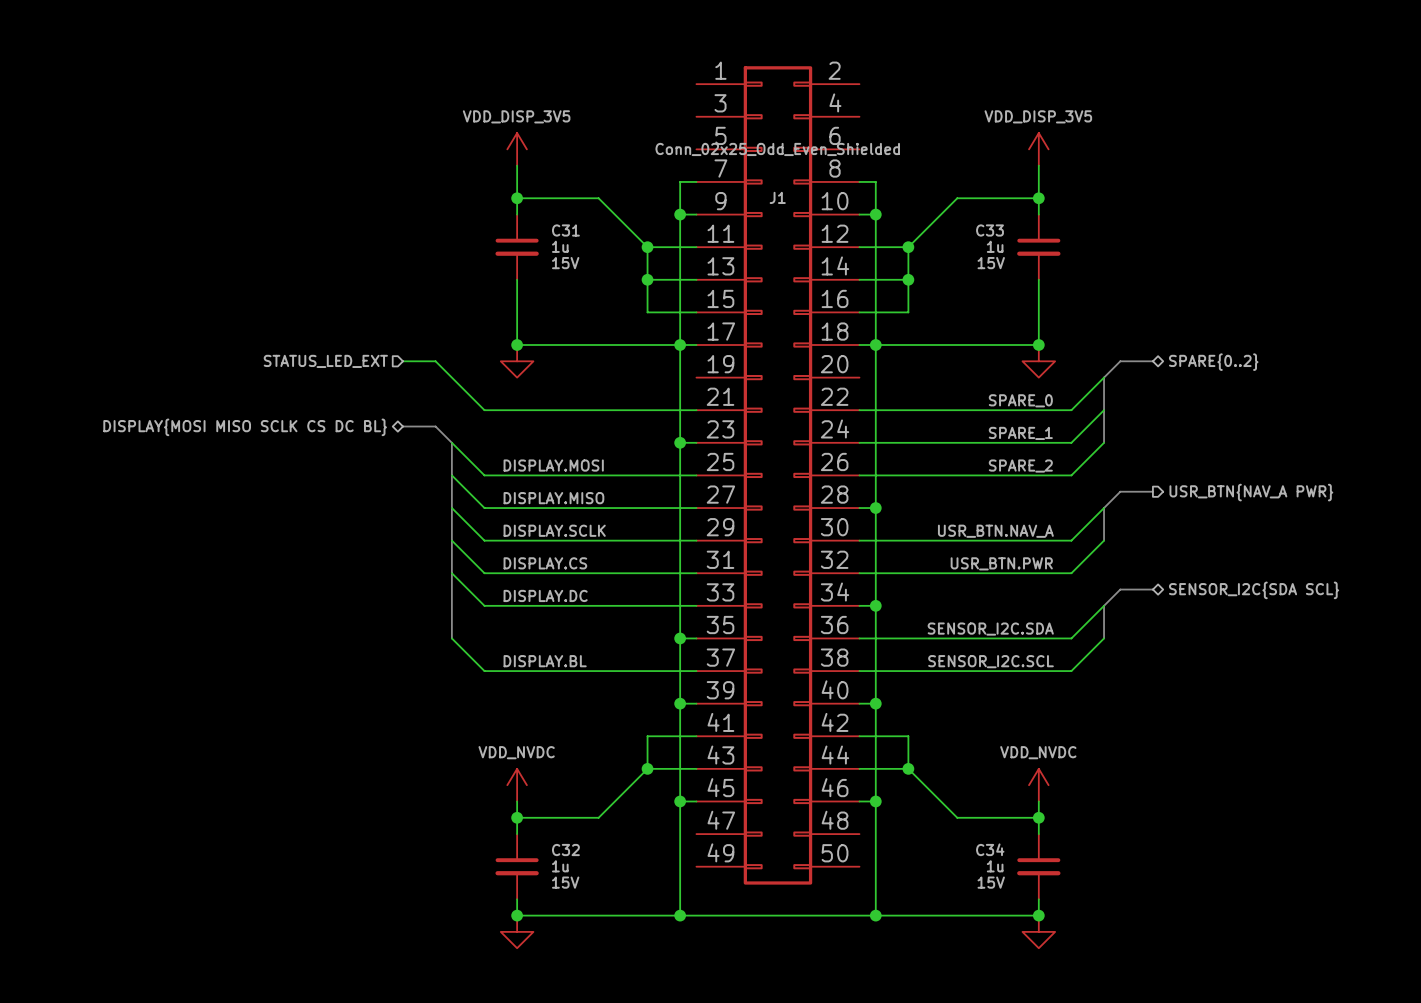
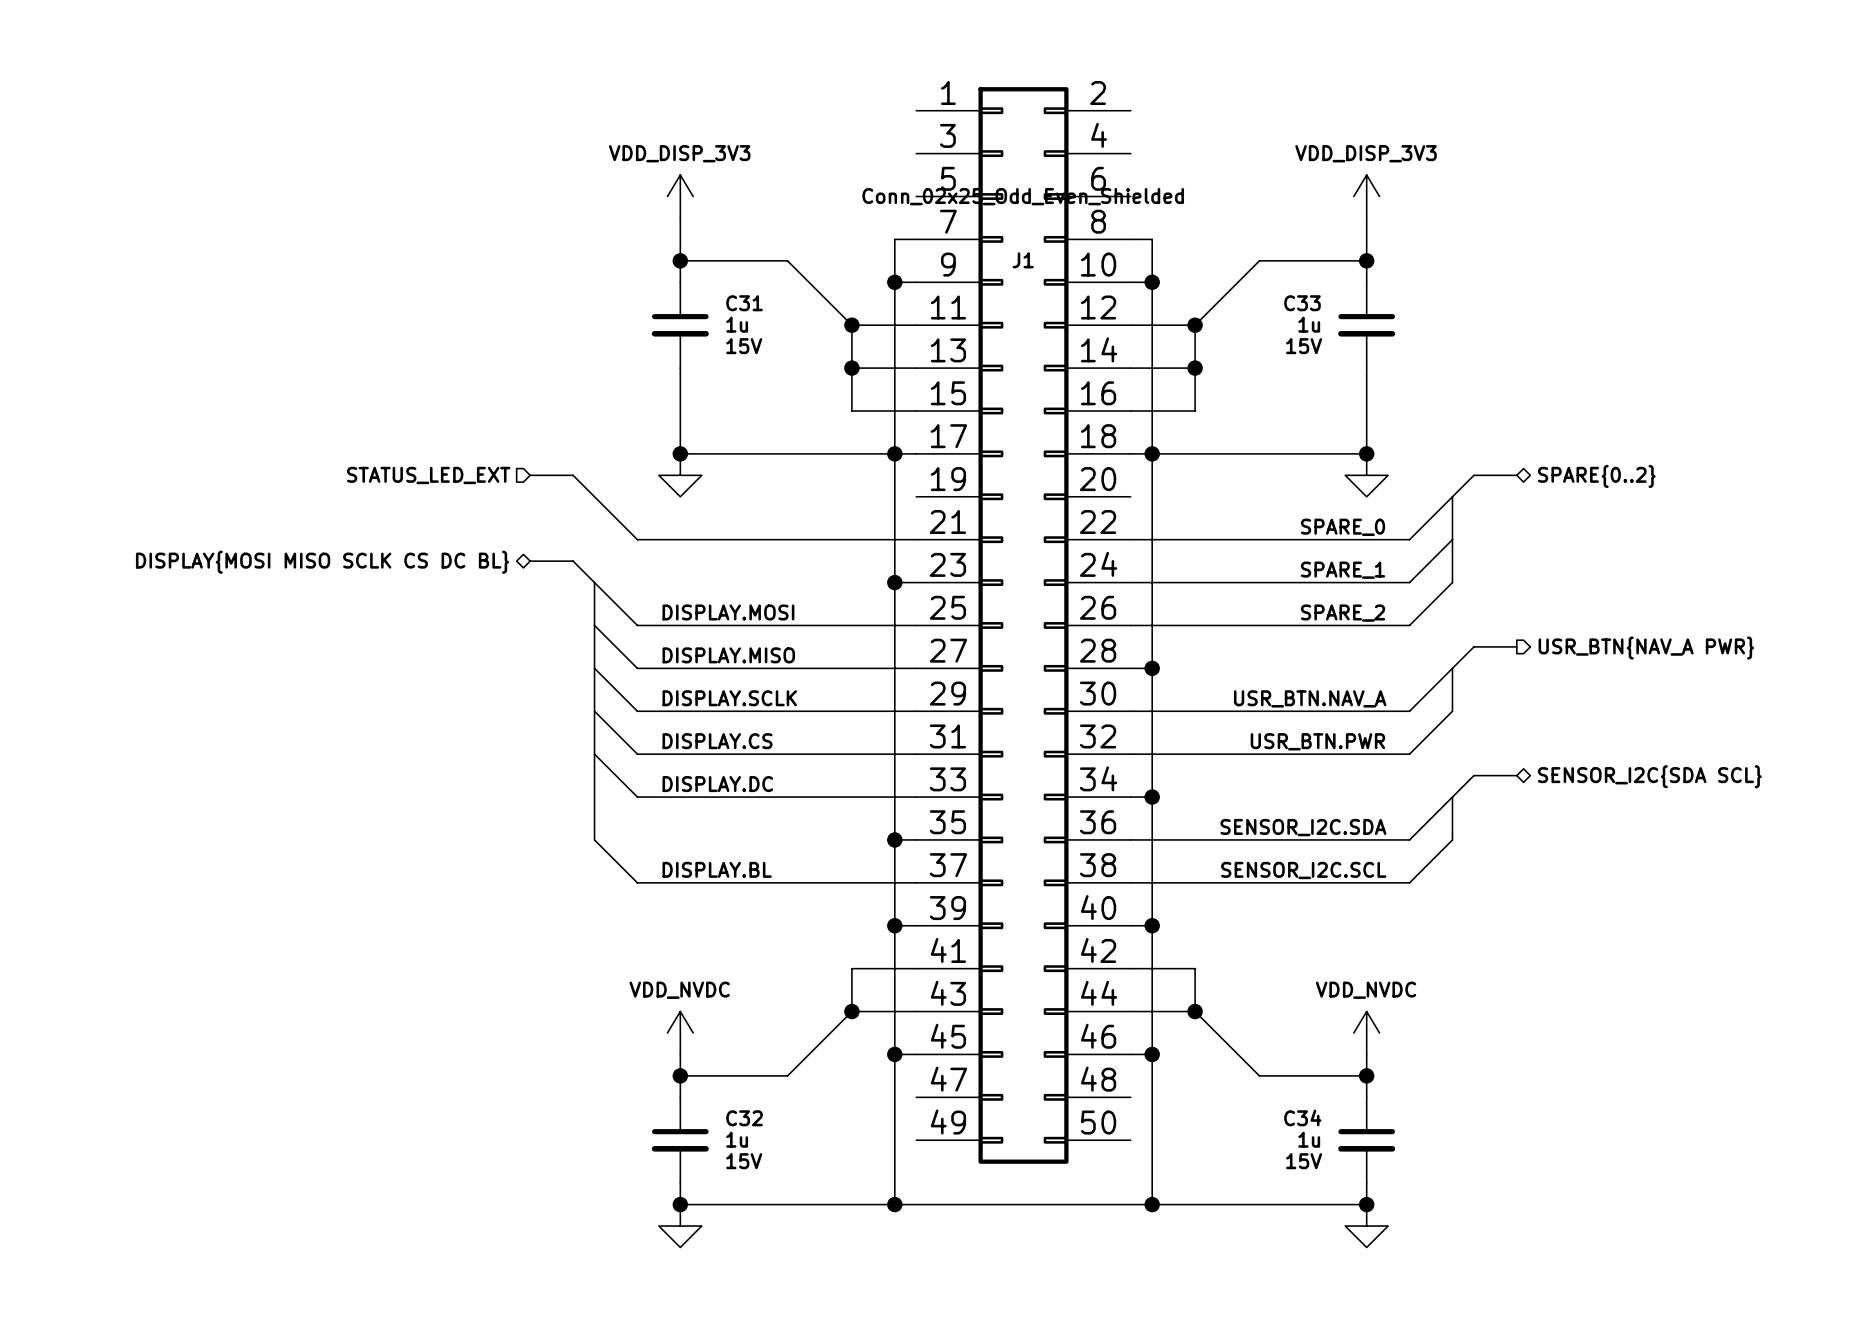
power symbol: VDD_DISP_3V5 (517, 149) -> VDD_DISP_3V3 (680, 196)
power symbol: VDD_DISP_3V5 (1038, 149) -> VDD_DISP_3V3 (1366, 196)

